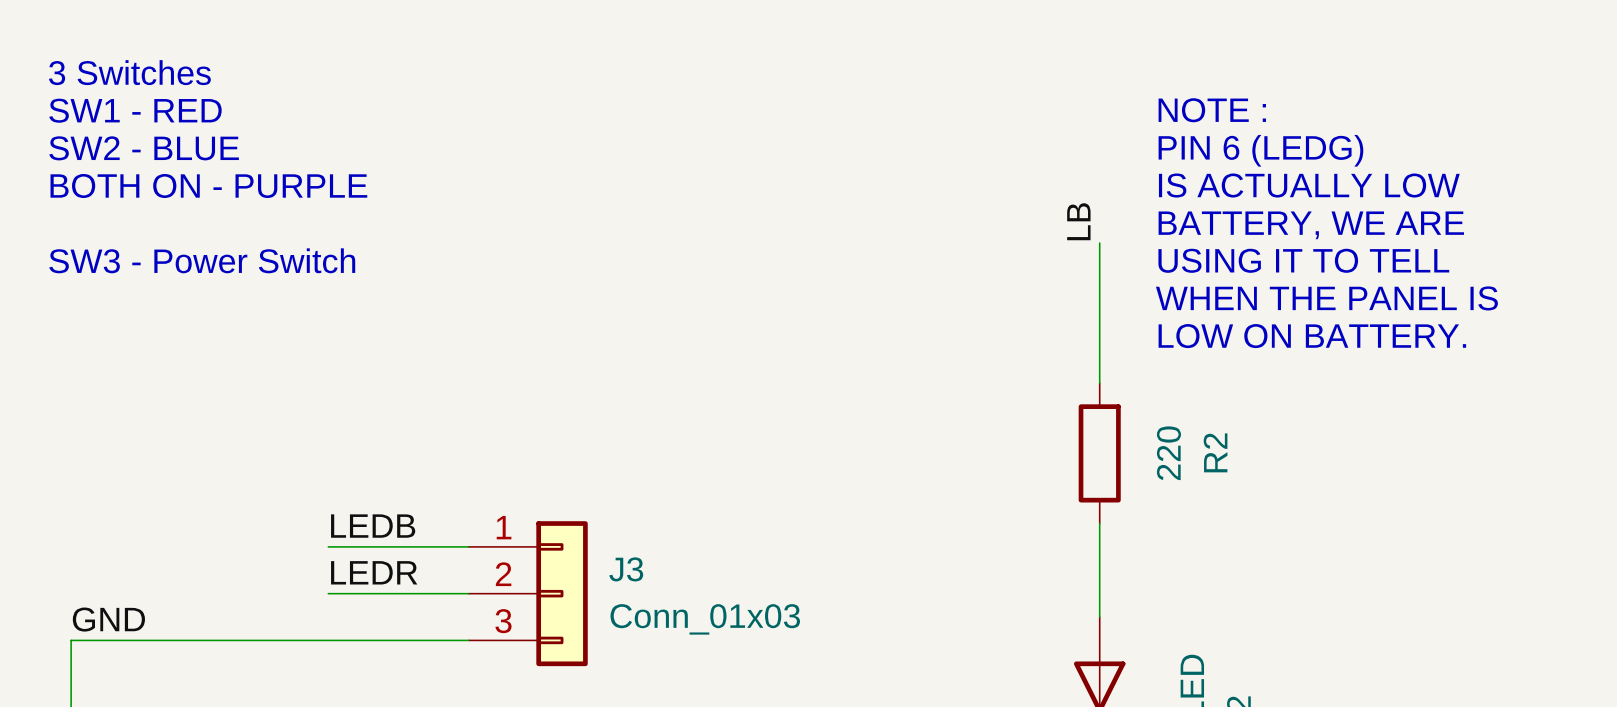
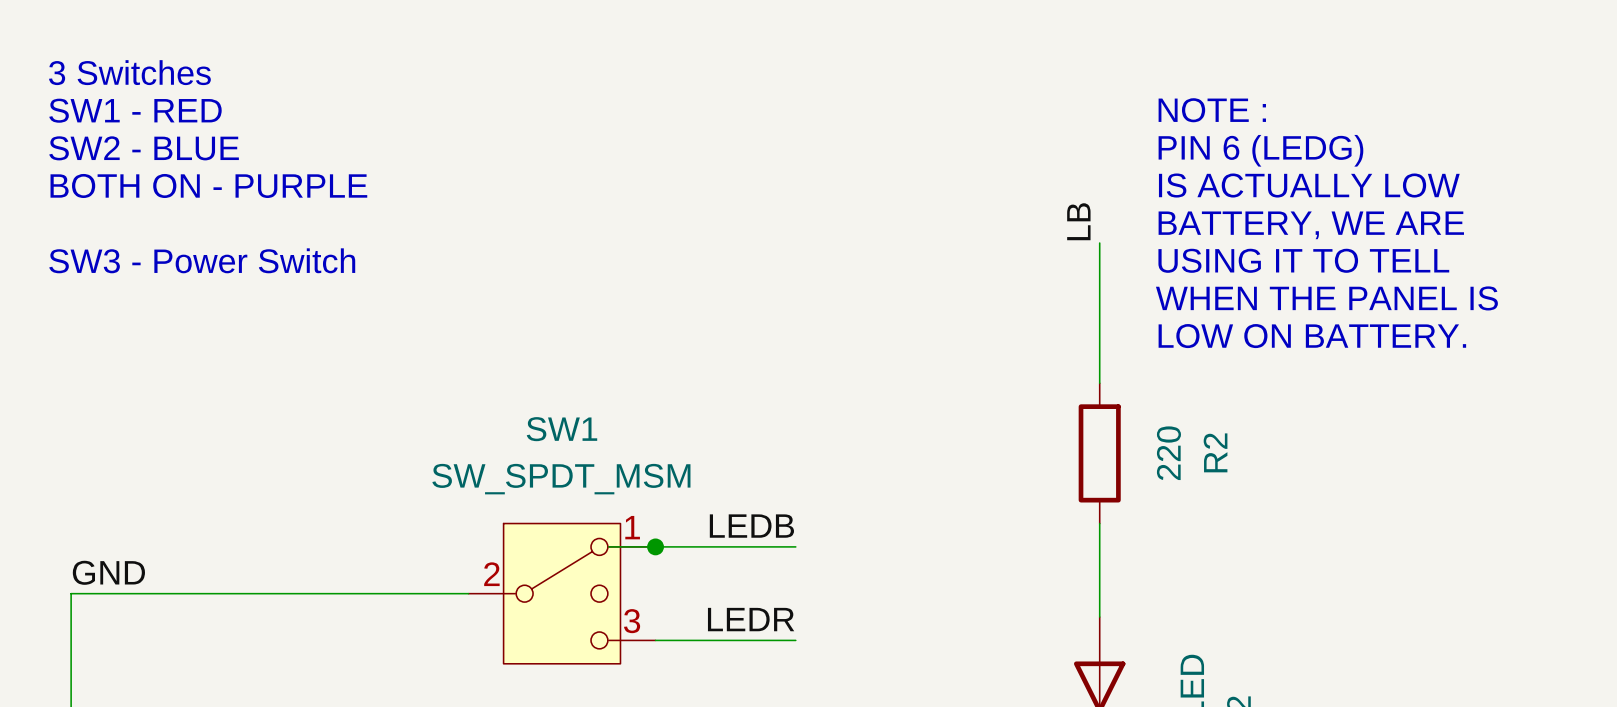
label: LEDB (373, 526) -> none
label: none -> LEDB (751, 526)
wire: (328, 546) (468, 546) -> (655, 640) (795, 640)
wire: none -> (608, 546) (795, 546)
junction: none -> (655, 546)
label: LEDR (374, 572) -> none
J3: Conn_01x03 (528, 593) -> none
SW1: none -> SW_SPDT_MSM (562, 593)
label position: GND (108, 619) -> GND (108, 572)
label: none -> LEDR (751, 619)
wire: (71, 640) (468, 640) -> (71, 640) (71, 593) (328, 593)

